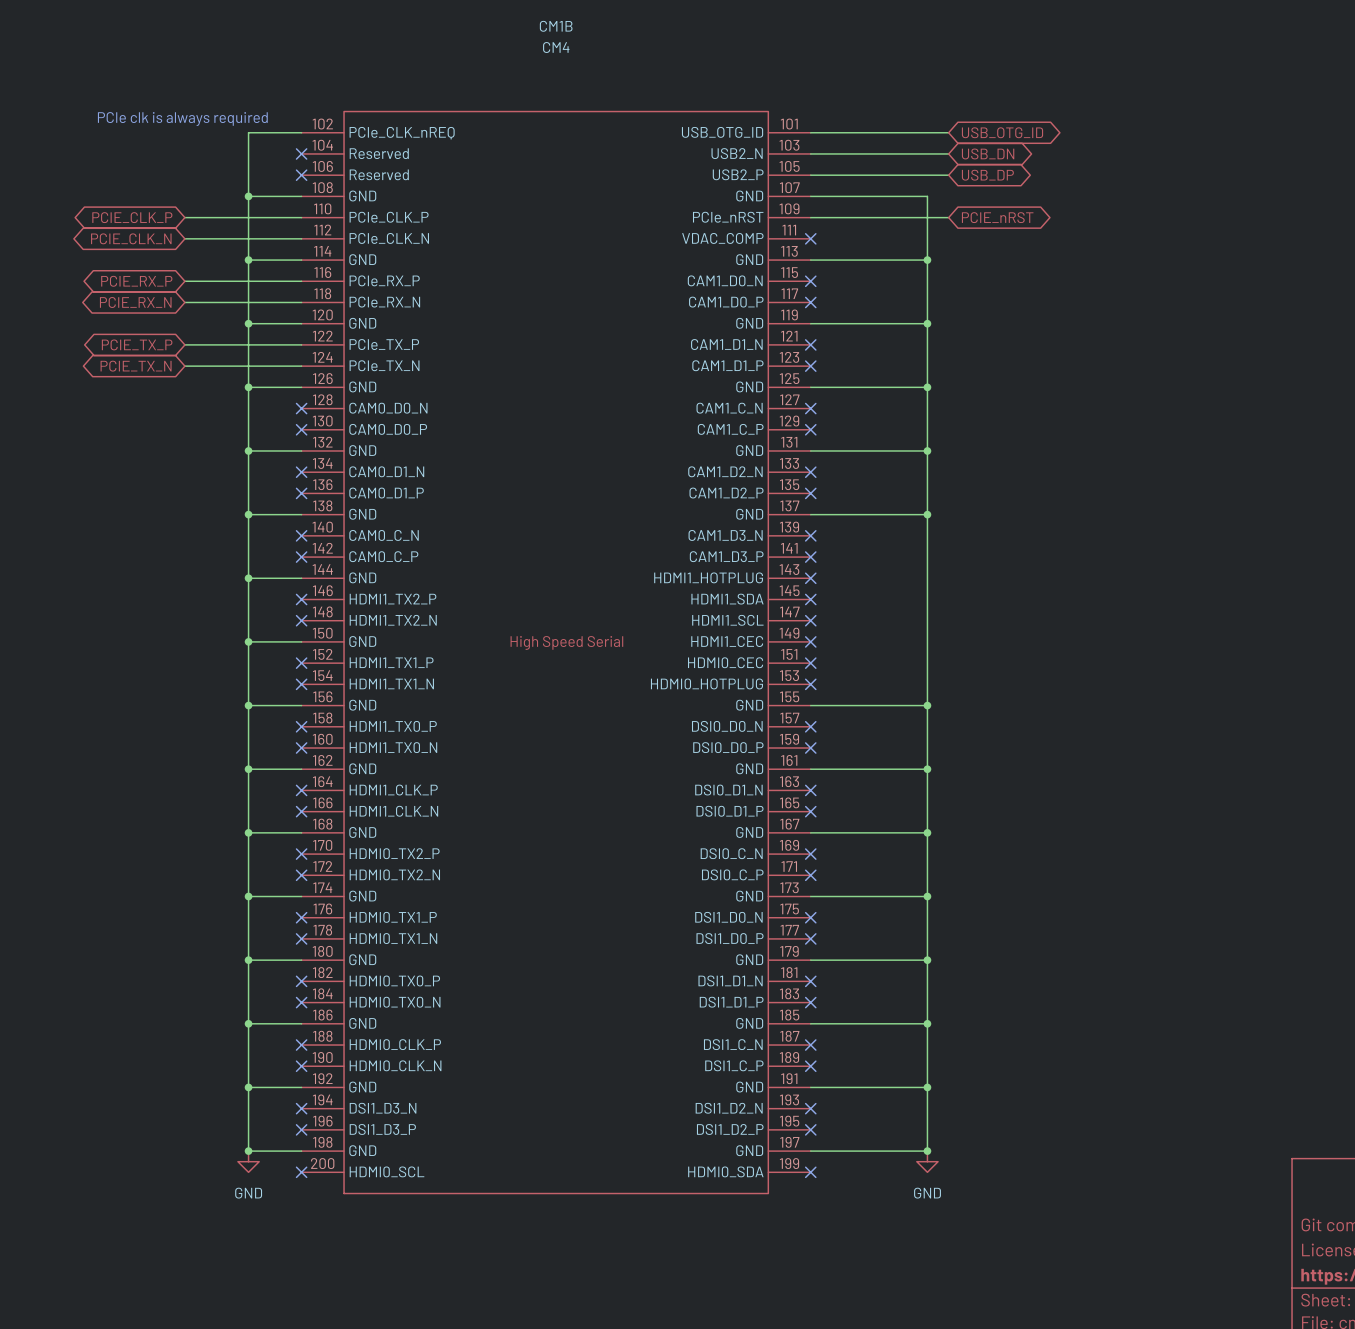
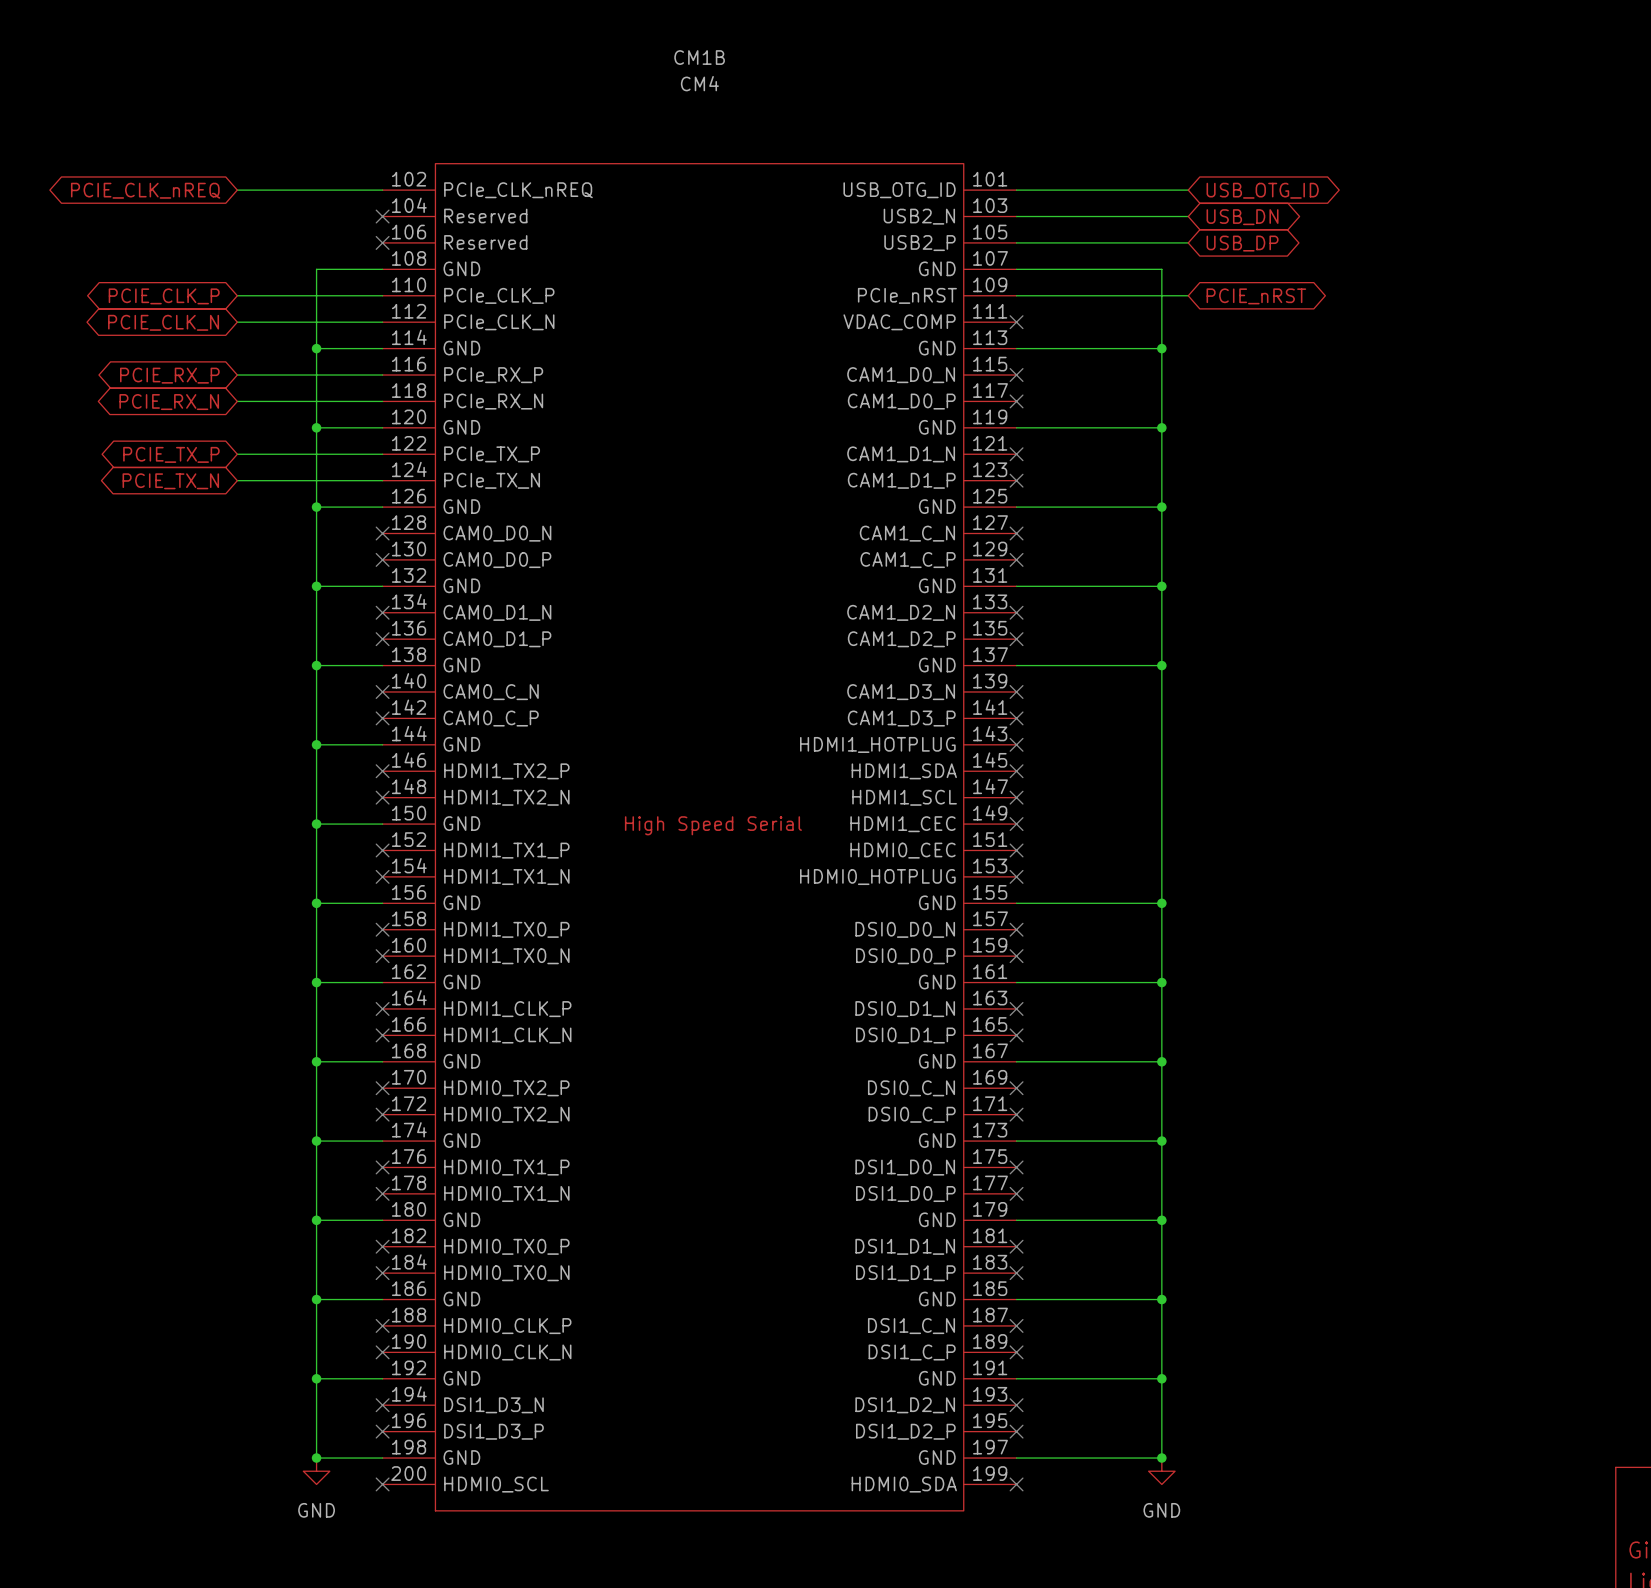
text: PCIe clk is always required (182, 118) -> none
wire: (248, 132) (248, 196) -> (316, 190) (237, 190)
global label: none -> PCIE_CLK_nREQ (145, 190)
junction: (248, 196) -> none

